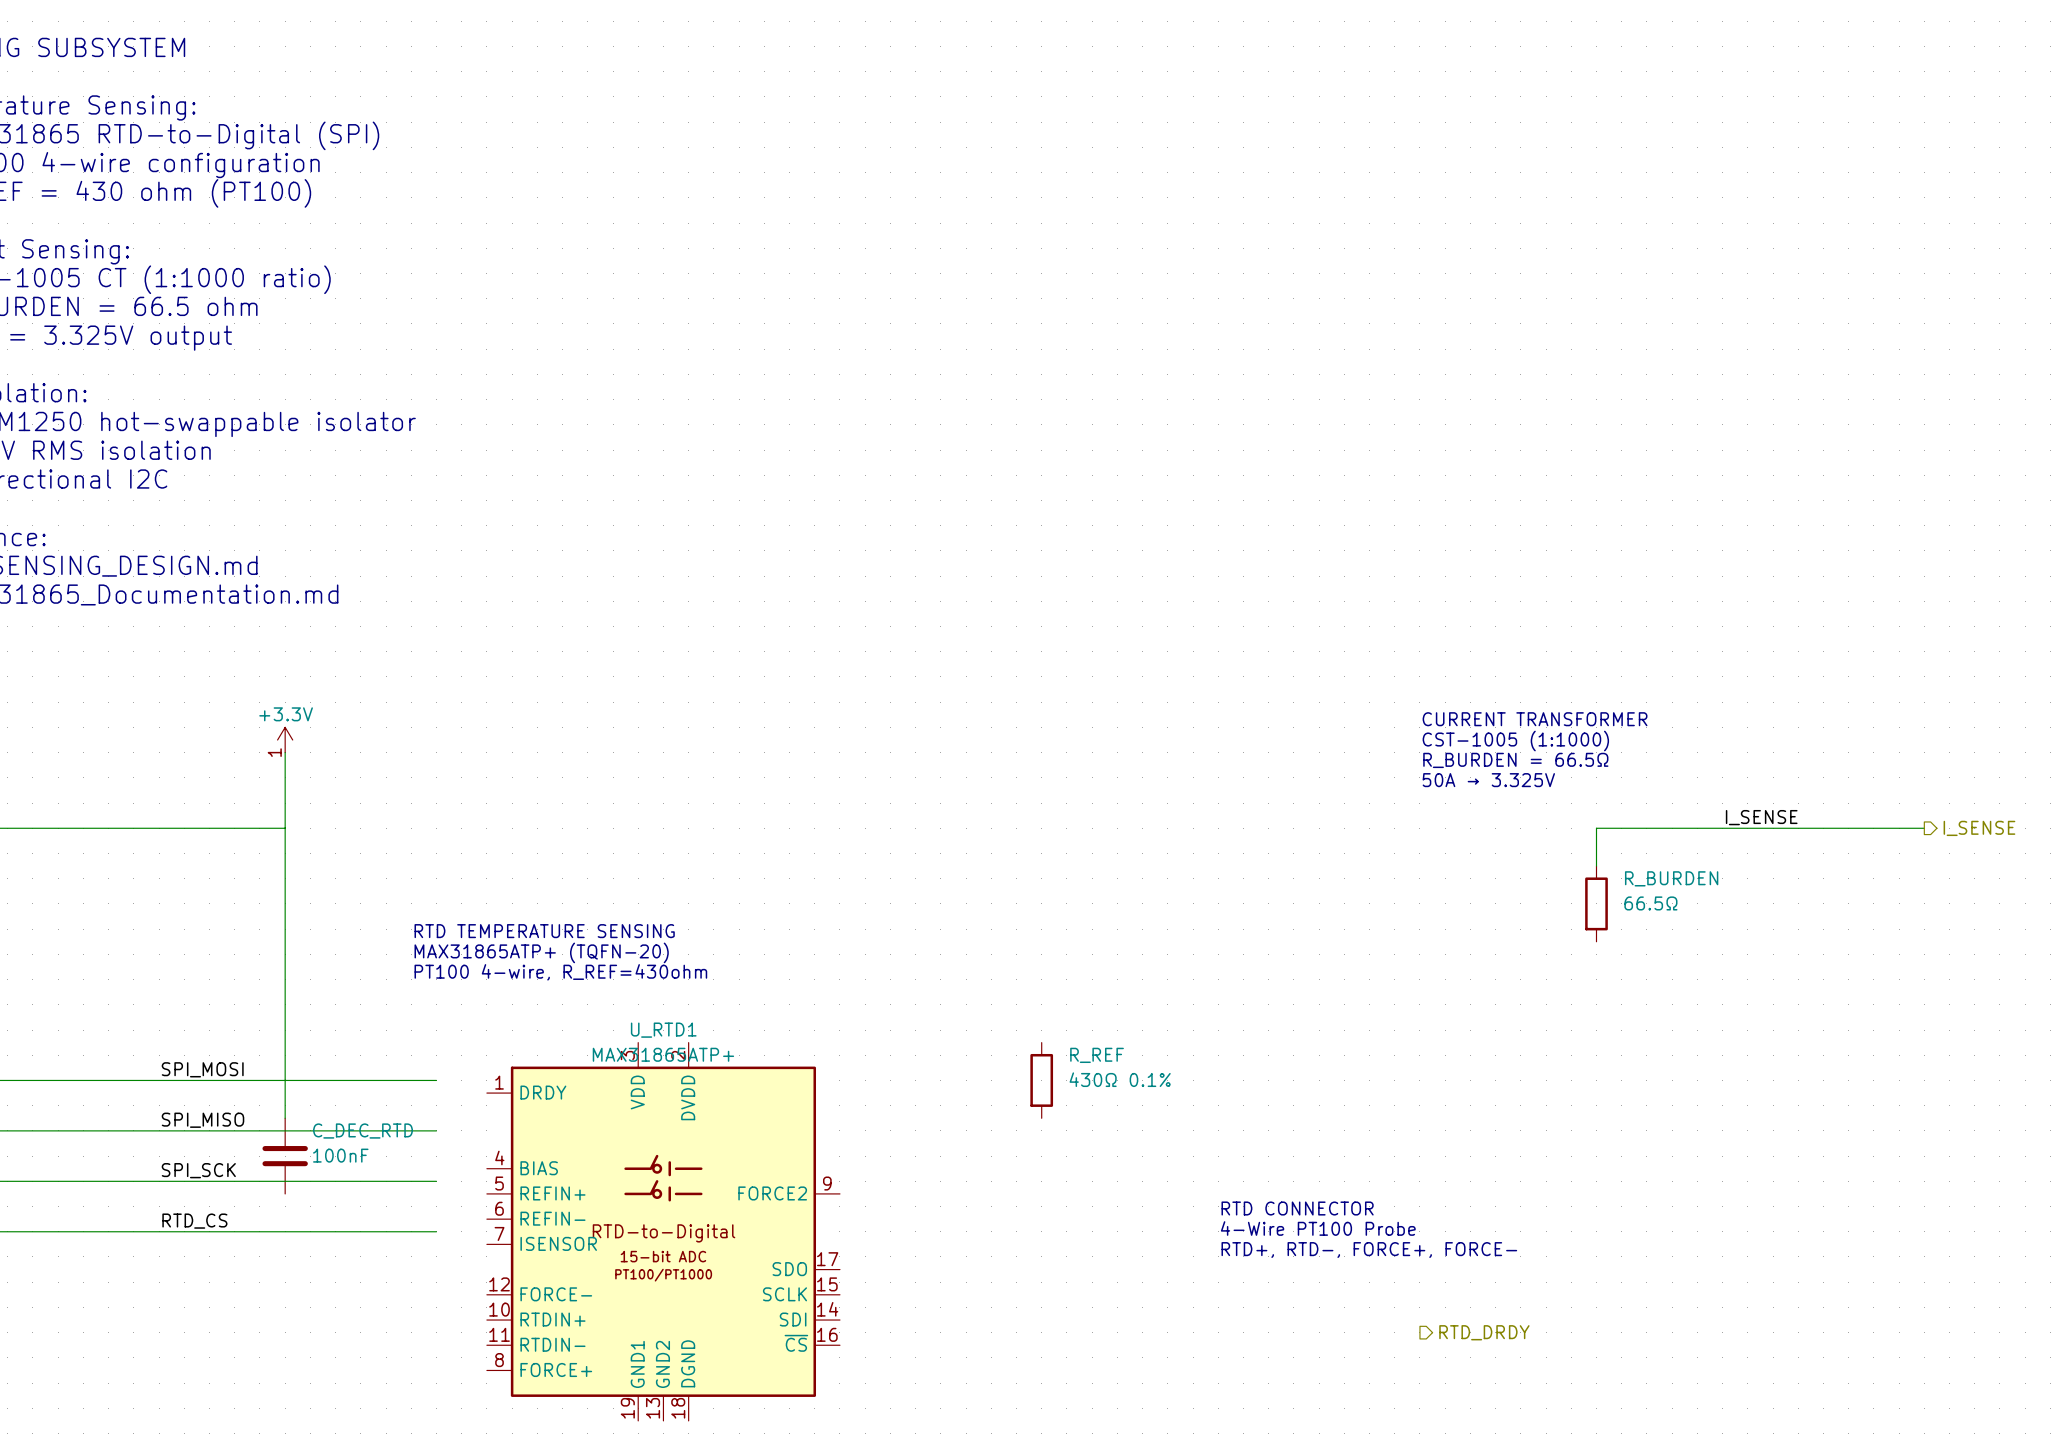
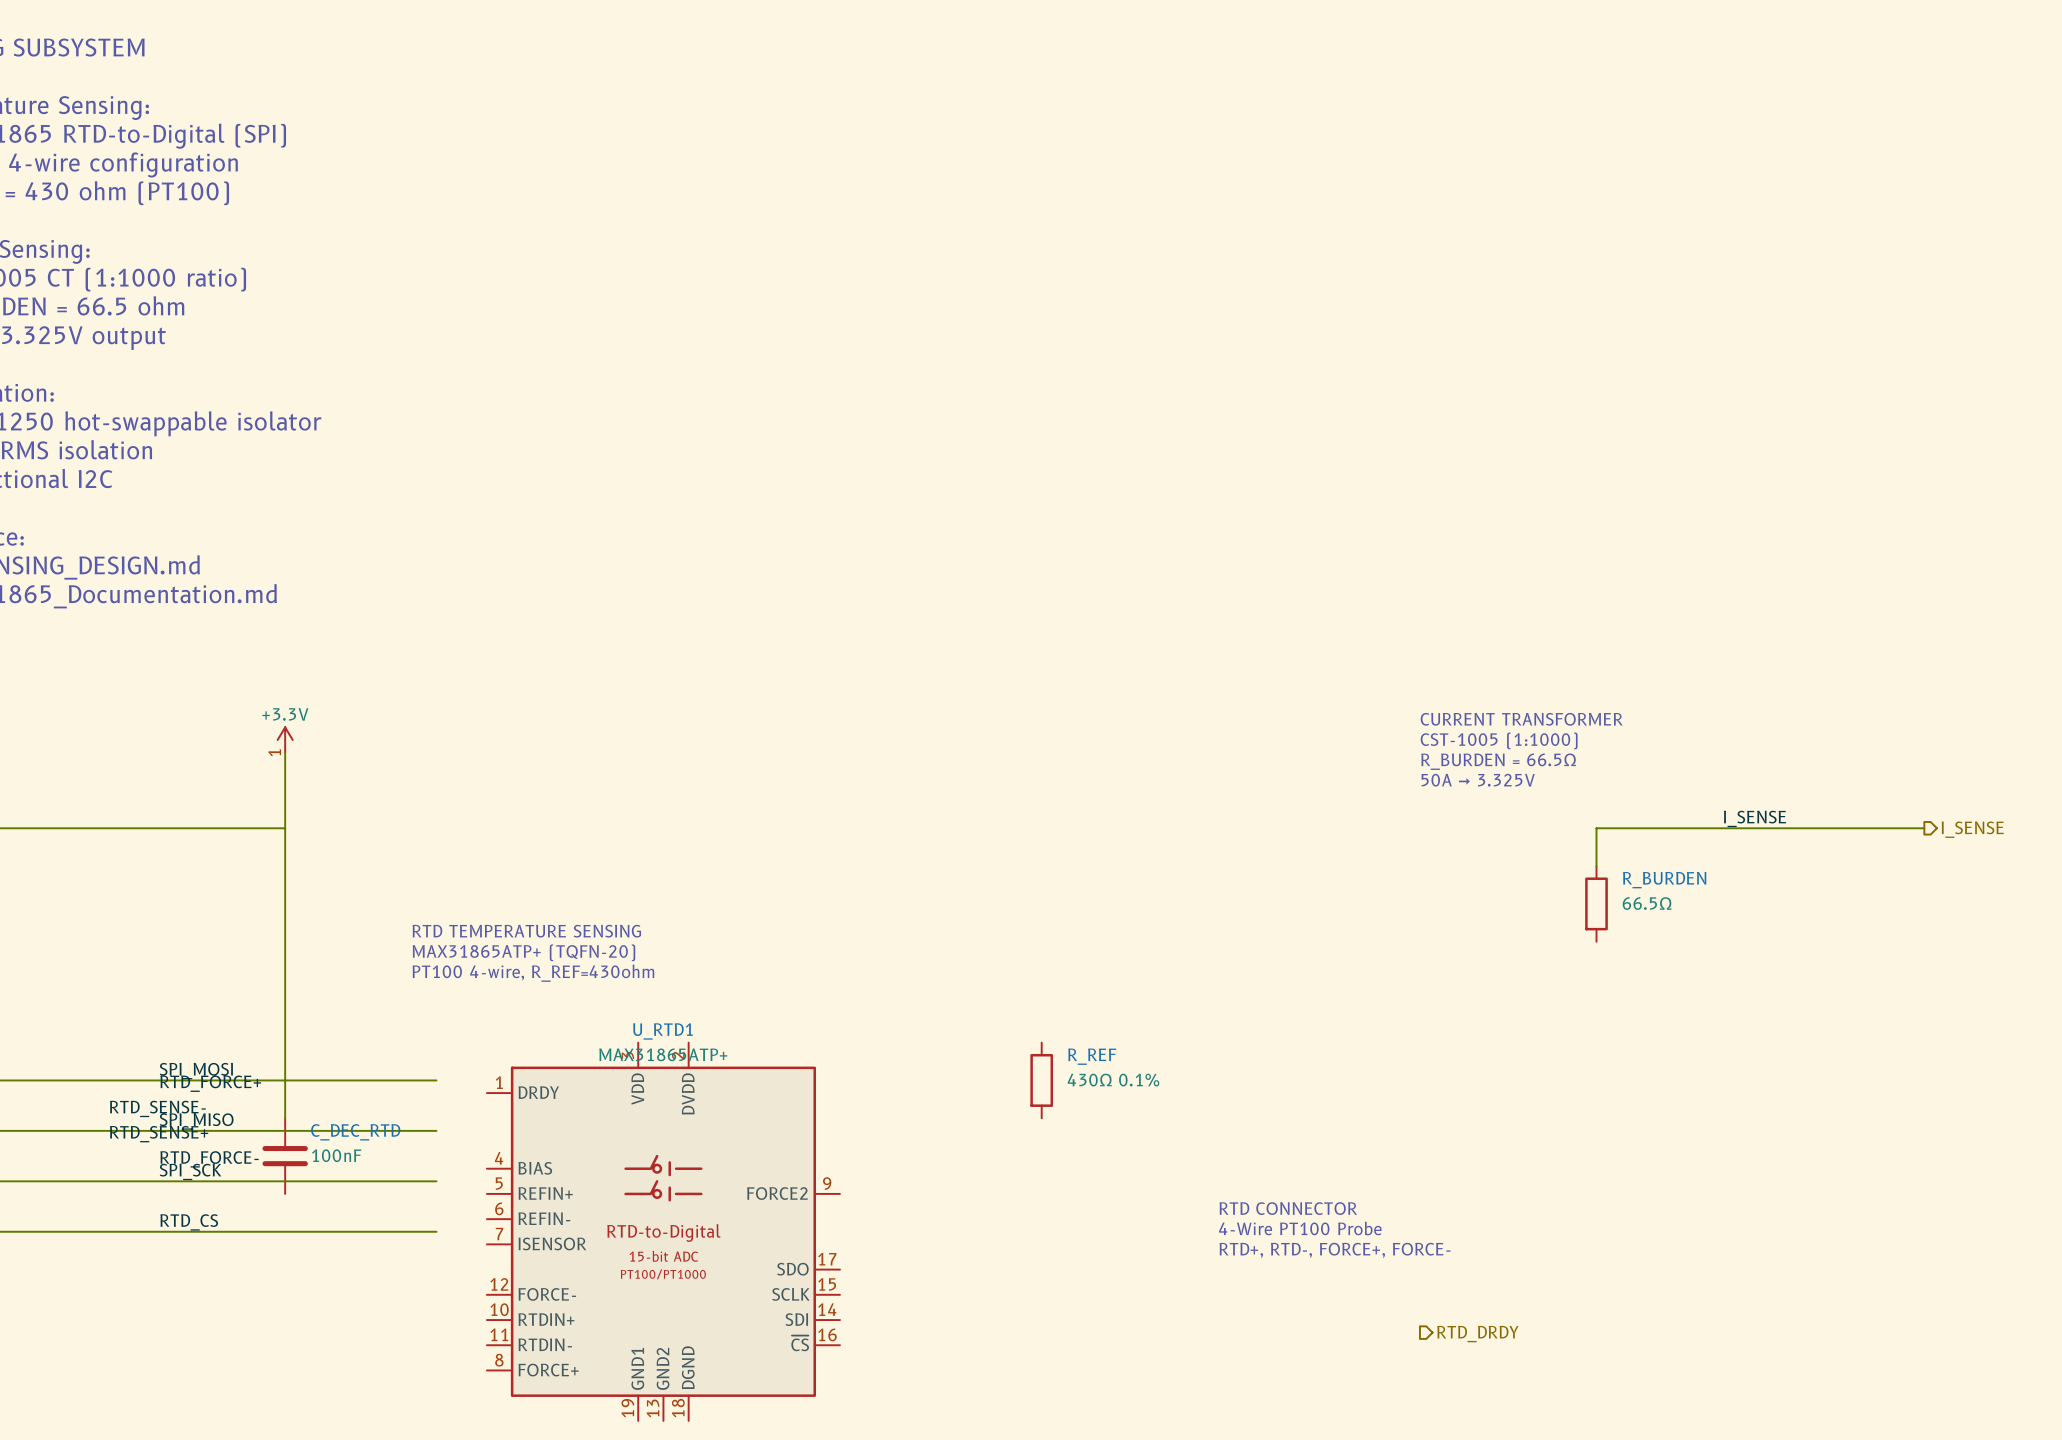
label: none -> RTD_FORCE+ (210, 1083)
label: none -> RTD_SENSE- (157, 1108)
label: none -> RTD_SENSE+ (159, 1134)
label: none -> RTD_FORCE- (209, 1159)

